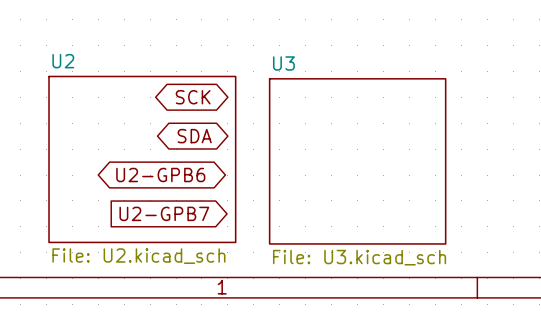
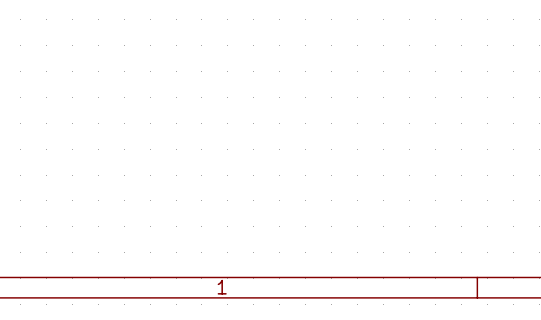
global label: SCK (193, 97) -> none
global label: SDA (194, 136) -> none
sheet U2: File: U2.kicad_sch (142, 159) -> none
sheet U3: File: U3.kicad_sch (357, 161) -> none
global label: U2-GPB6 (160, 175) -> none
global label: U2-GPB7 (164, 213) -> none

